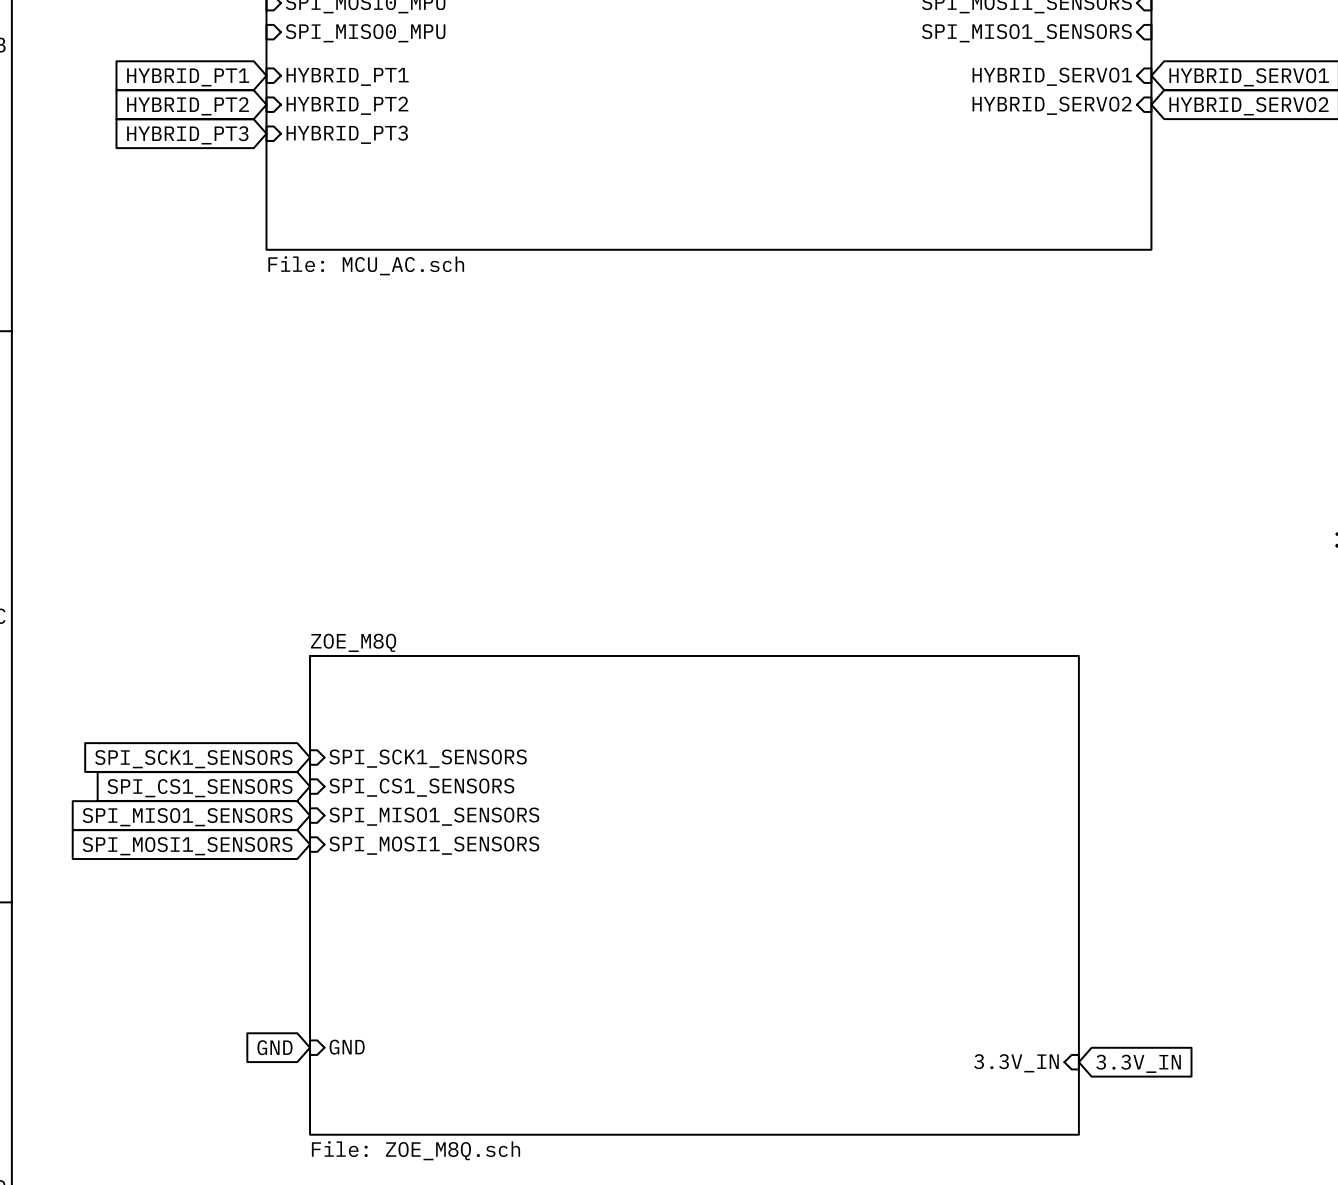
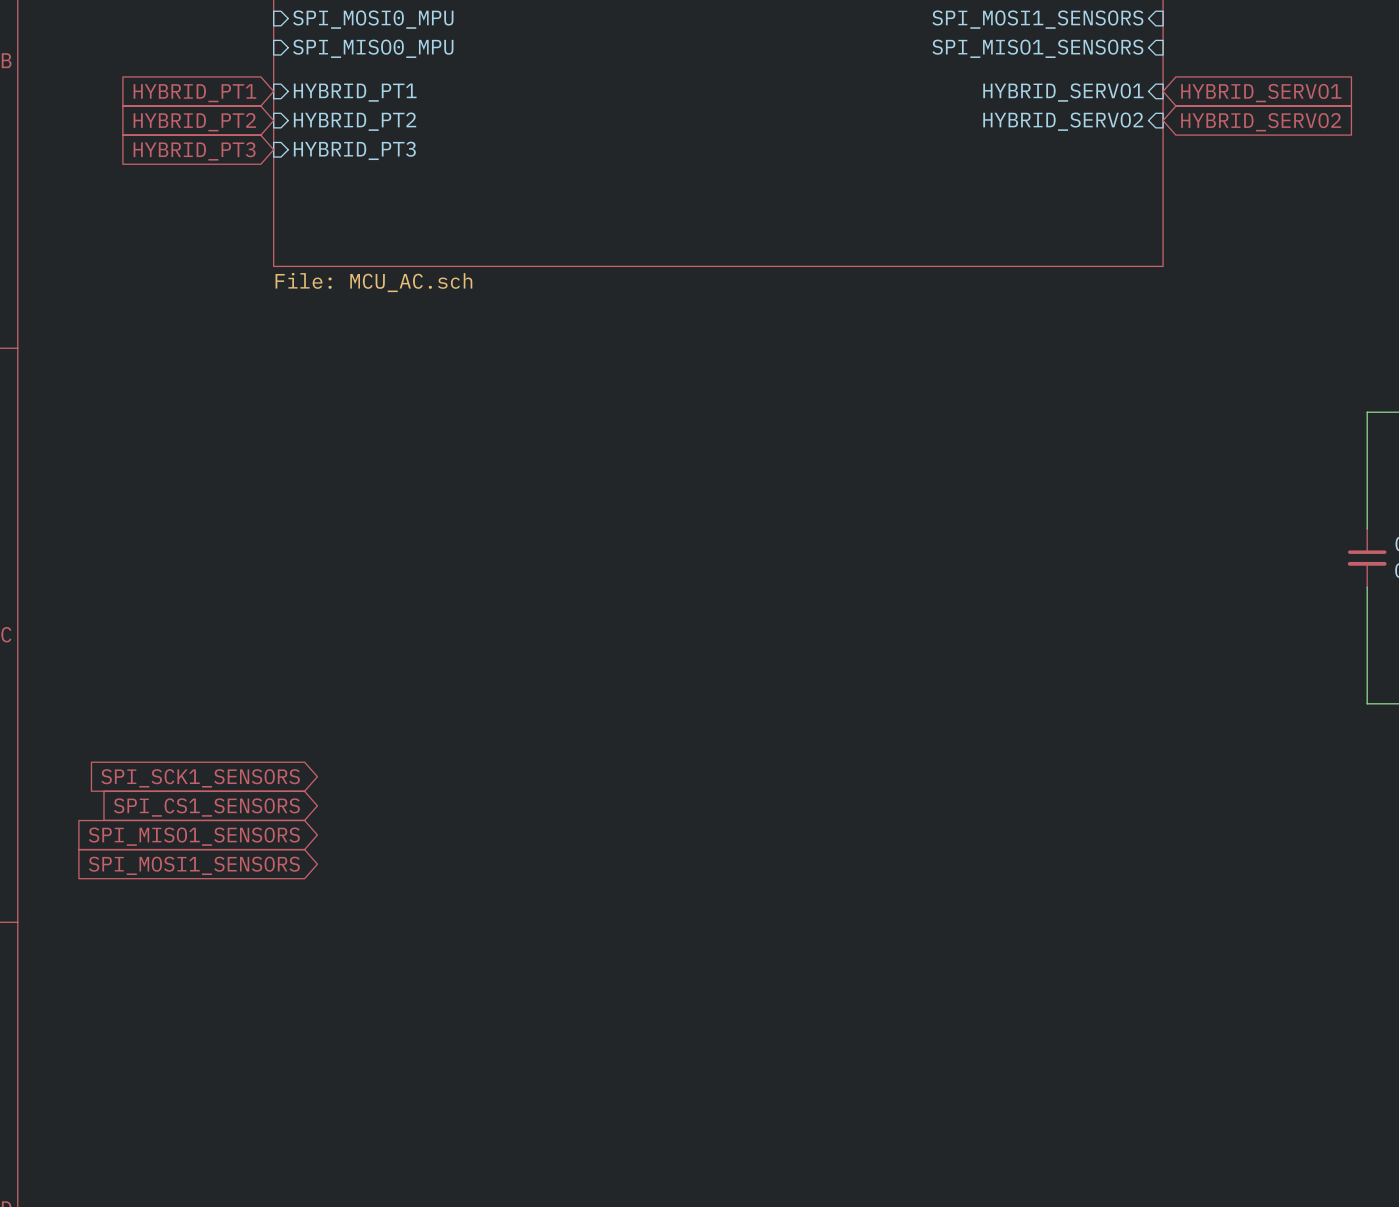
sheet pin: SPI_SCK1_SENSORS (428, 758) -> none
sheet pin: SPI_CS1_SENSORS (421, 787) -> none
sheet pin: SPI_MISO1_SENSORS (434, 816) -> none
sheet pin: SPI_MOSI1_SENSORS (434, 845) -> none
sheet ZOE_M8Q: File: ZOE_M8Q.sch (694, 895) -> none
global label: GND (274, 1047) -> none
sheet pin: GND (347, 1047) -> none
sheet pin: 3.3V_IN (1016, 1063) -> none
global label: 3.3V_IN (1138, 1063) -> none

